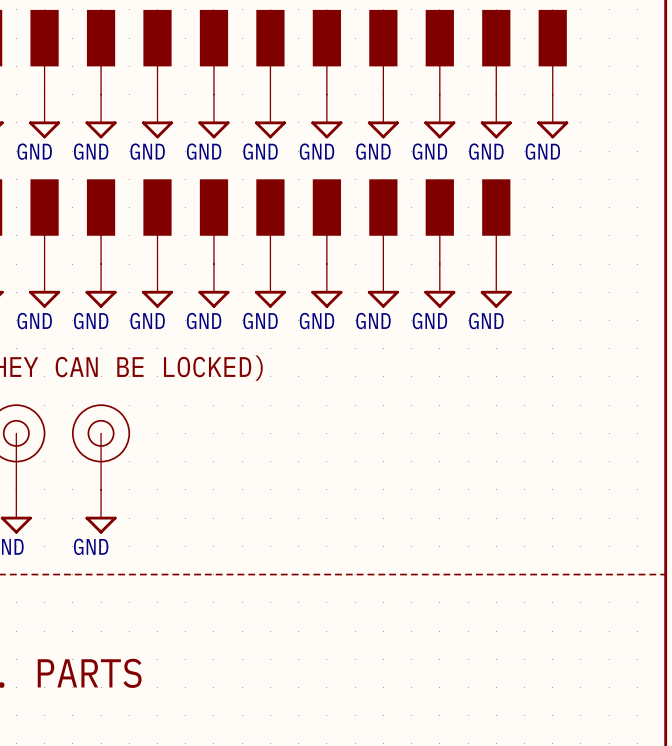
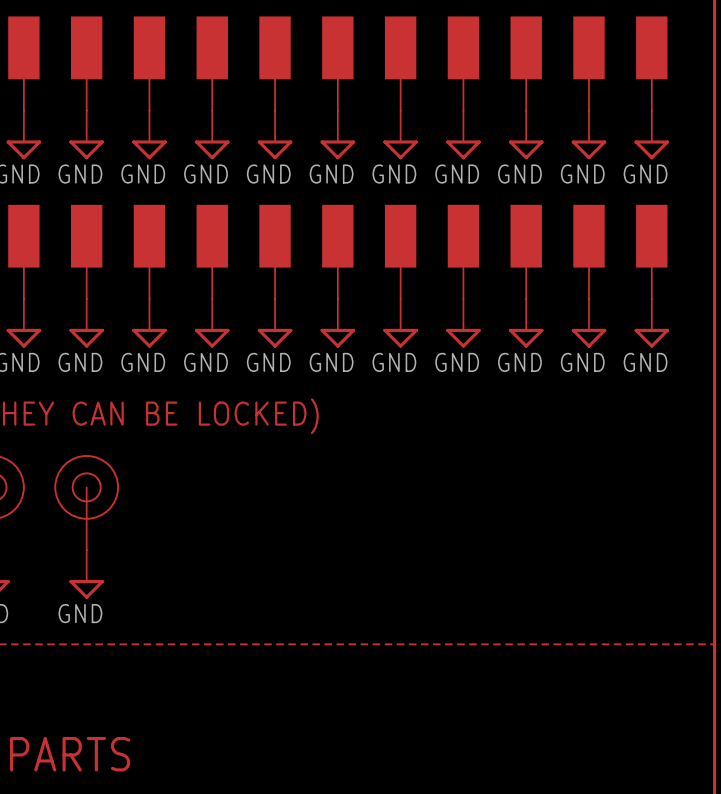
part: none -> (651, 63)
power symbol: none -> GND (651, 134)
part: none -> (589, 251)
part: none -> (651, 251)
power symbol: none -> GND (589, 323)
power symbol: none -> GND (651, 323)

